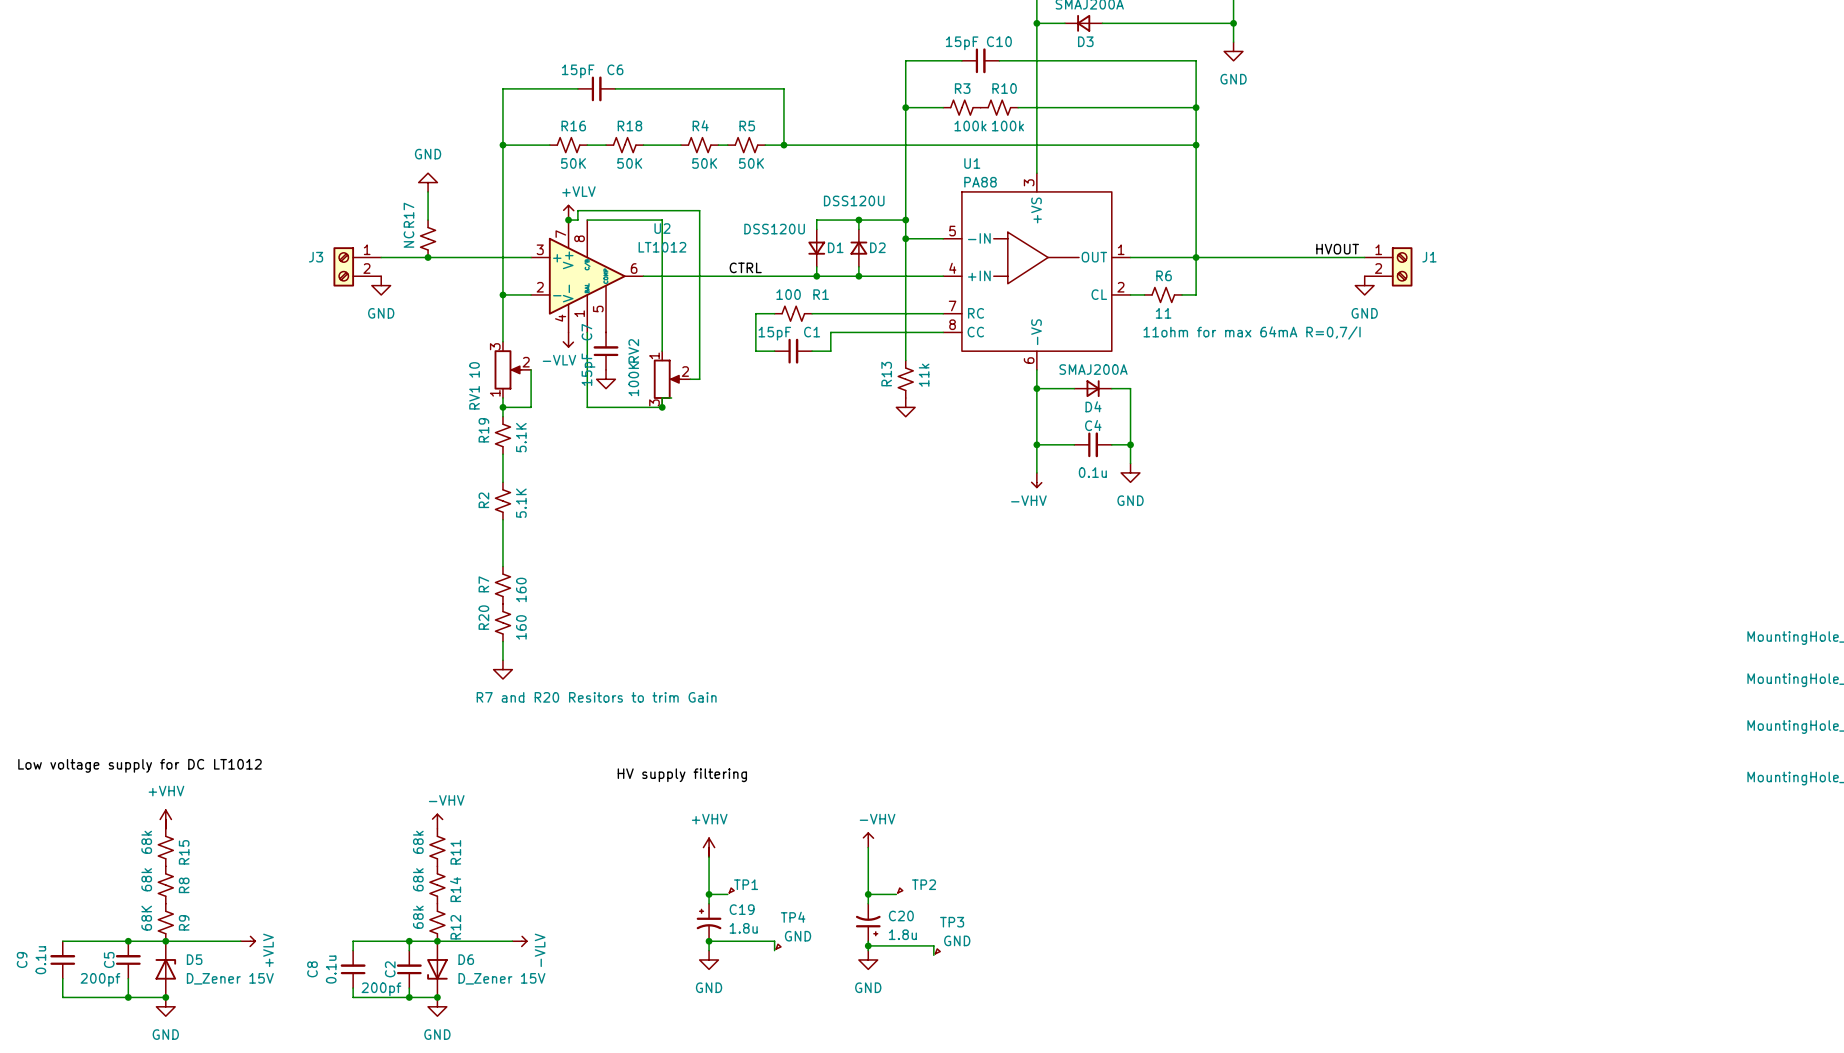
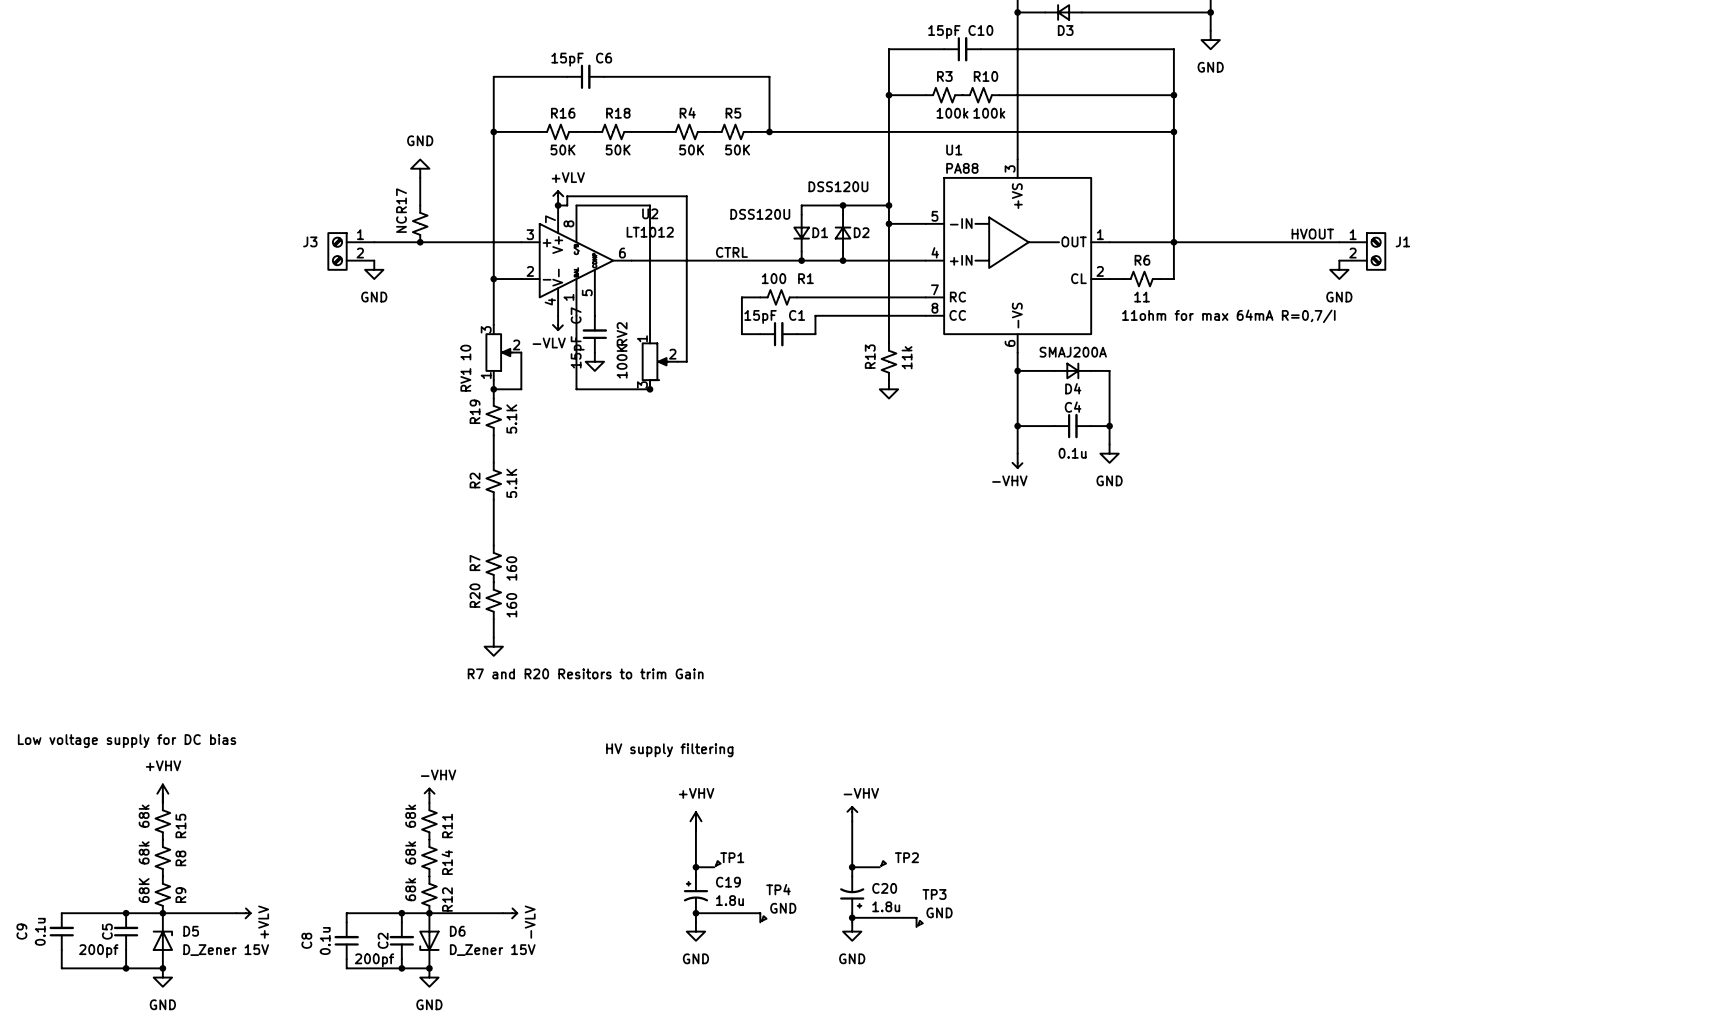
label: Low voltage supply for DC LT1012 (139, 765) -> Low voltage supply for DC bias (127, 741)

